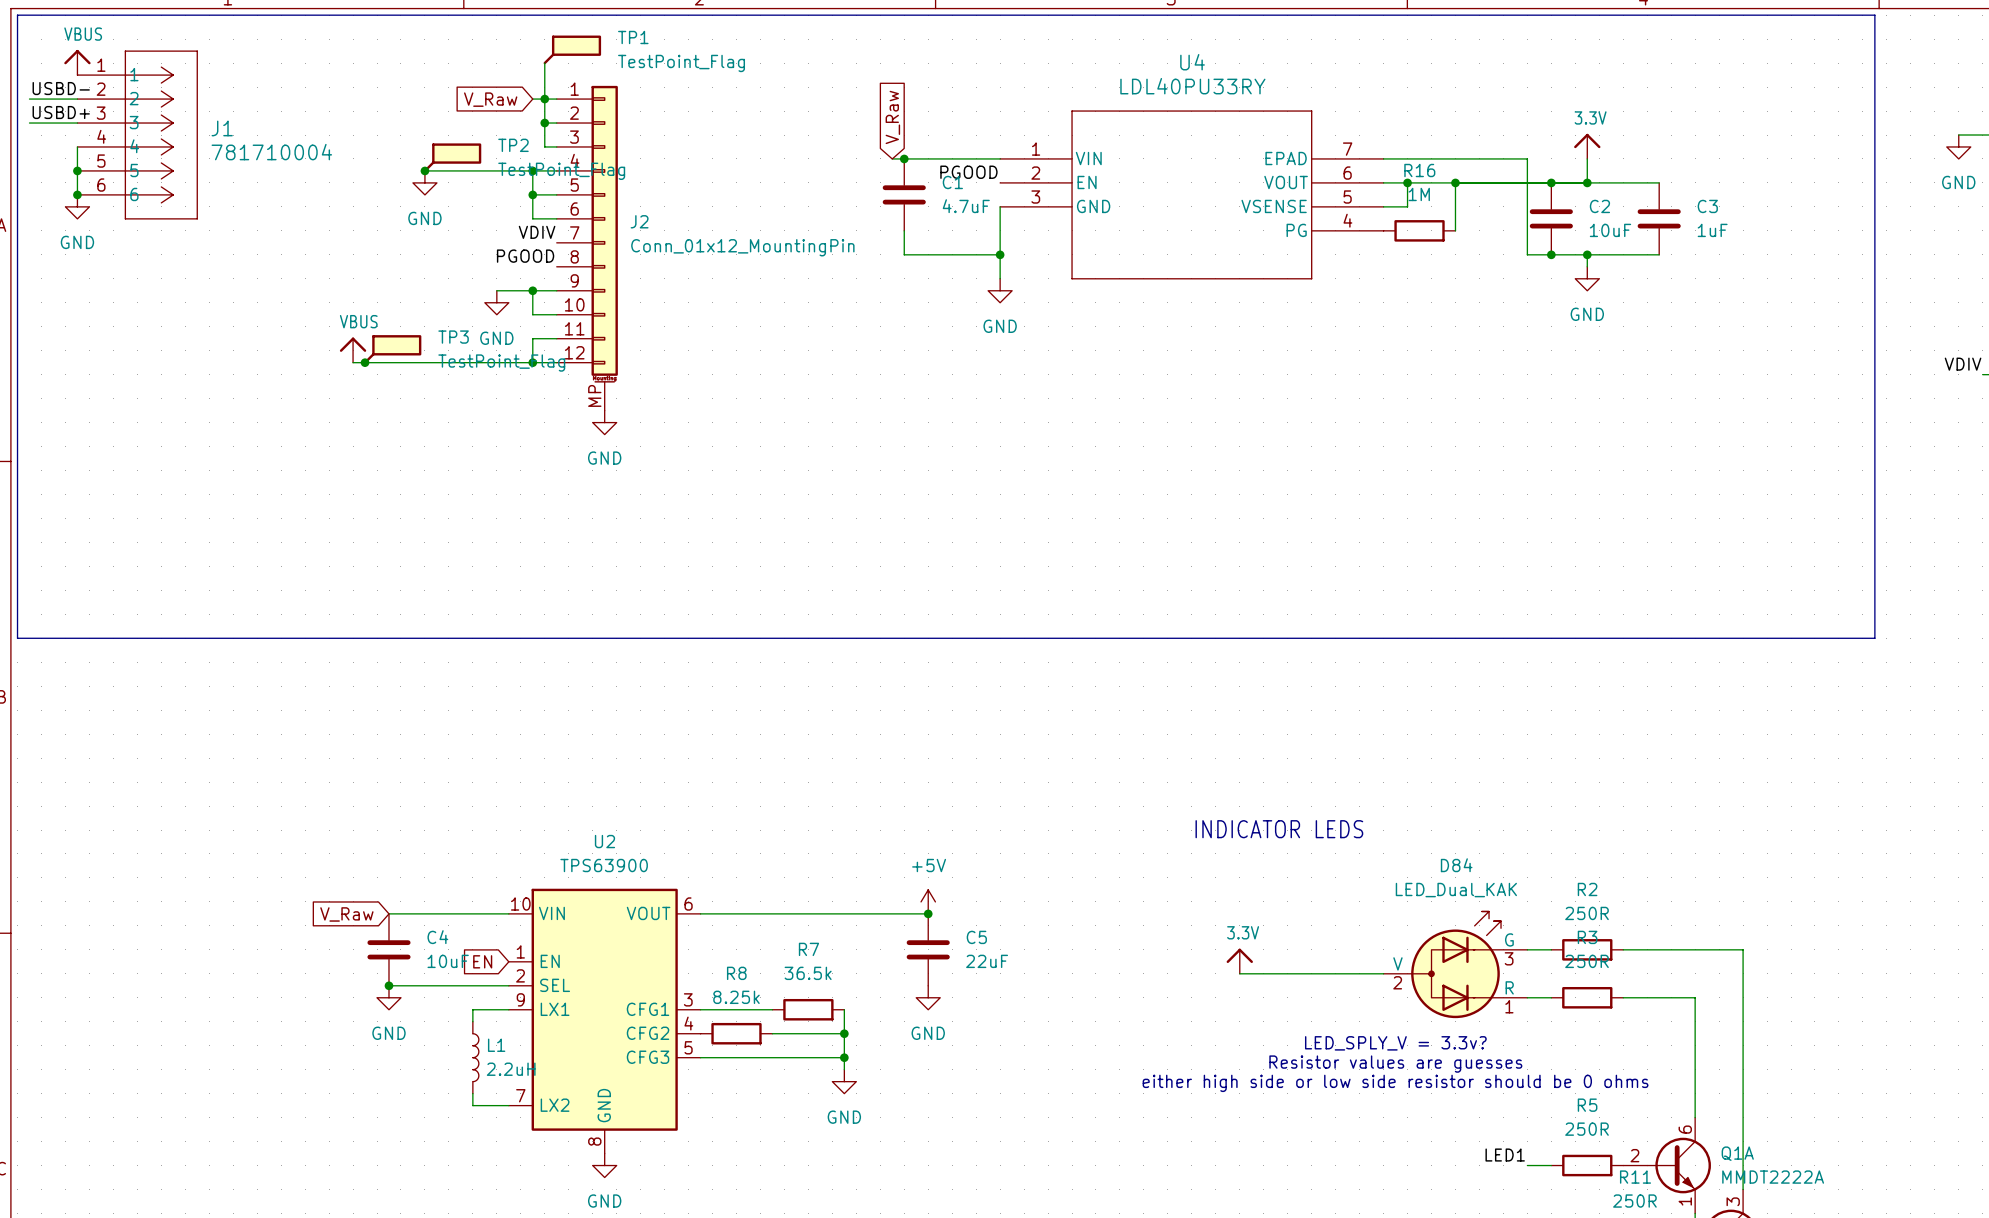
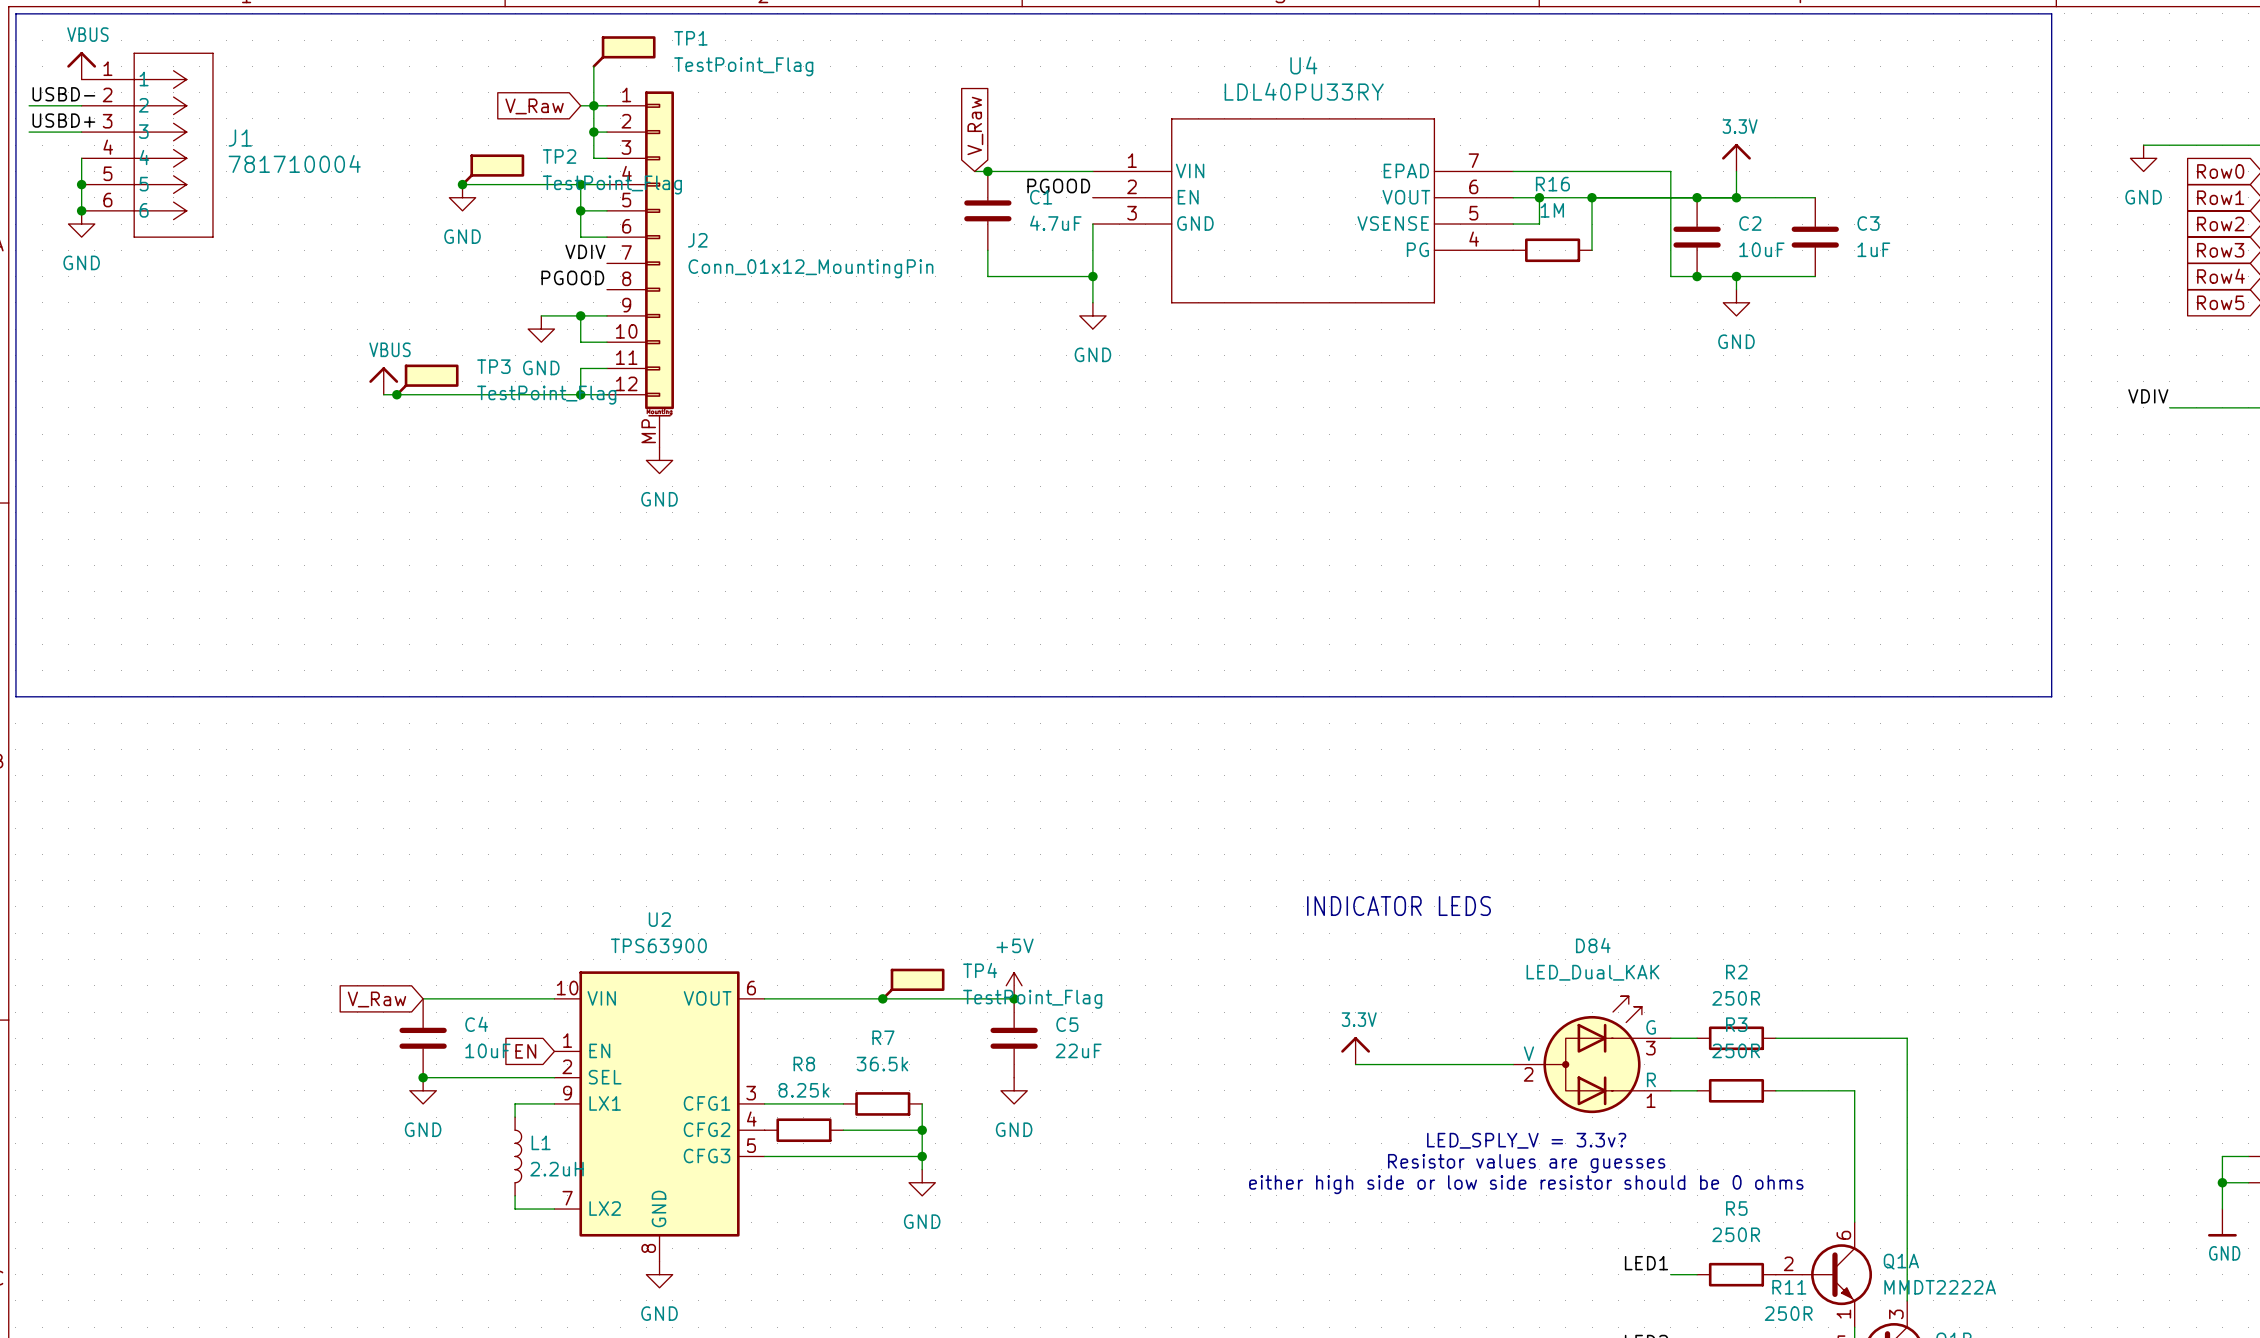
TP4: none -> TestPoint_Flag (913, 984)
junction: none -> (882, 998)

